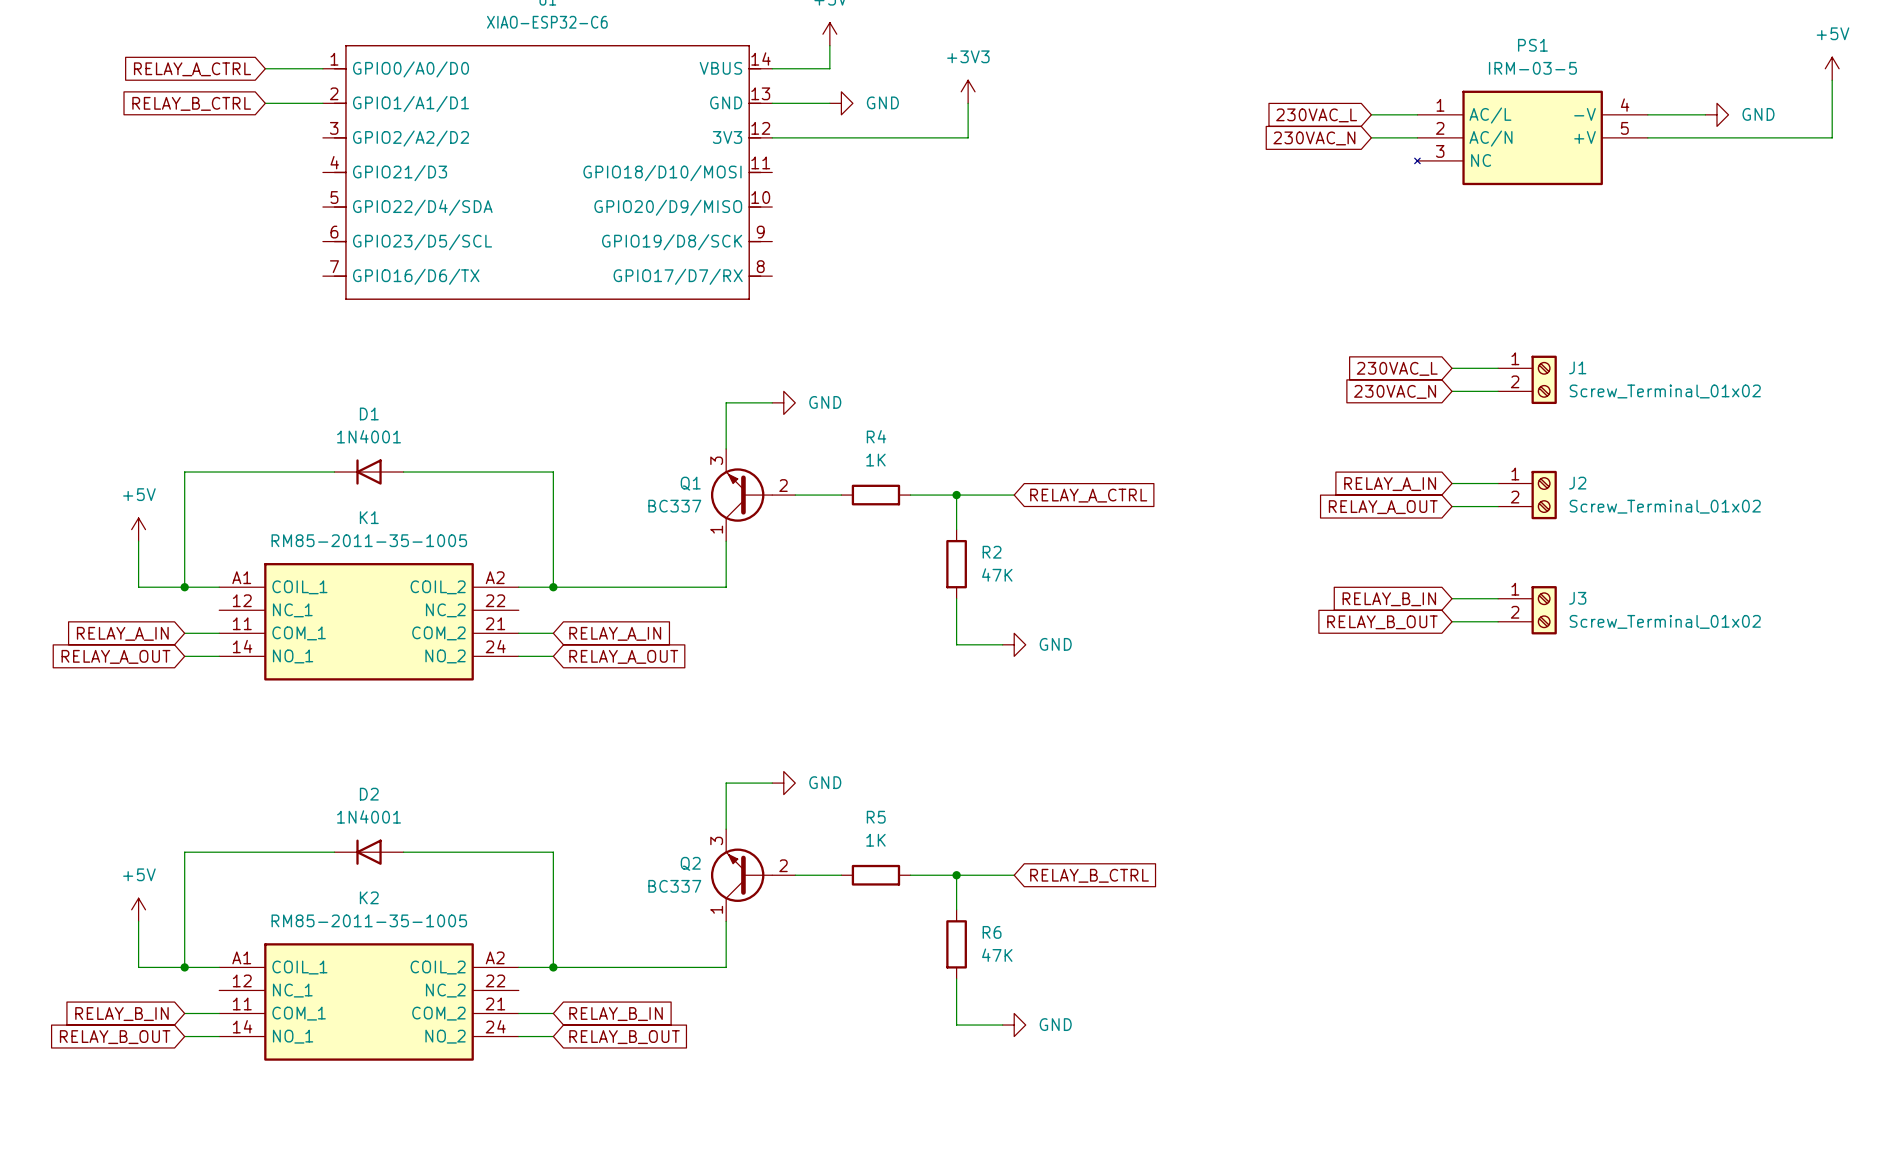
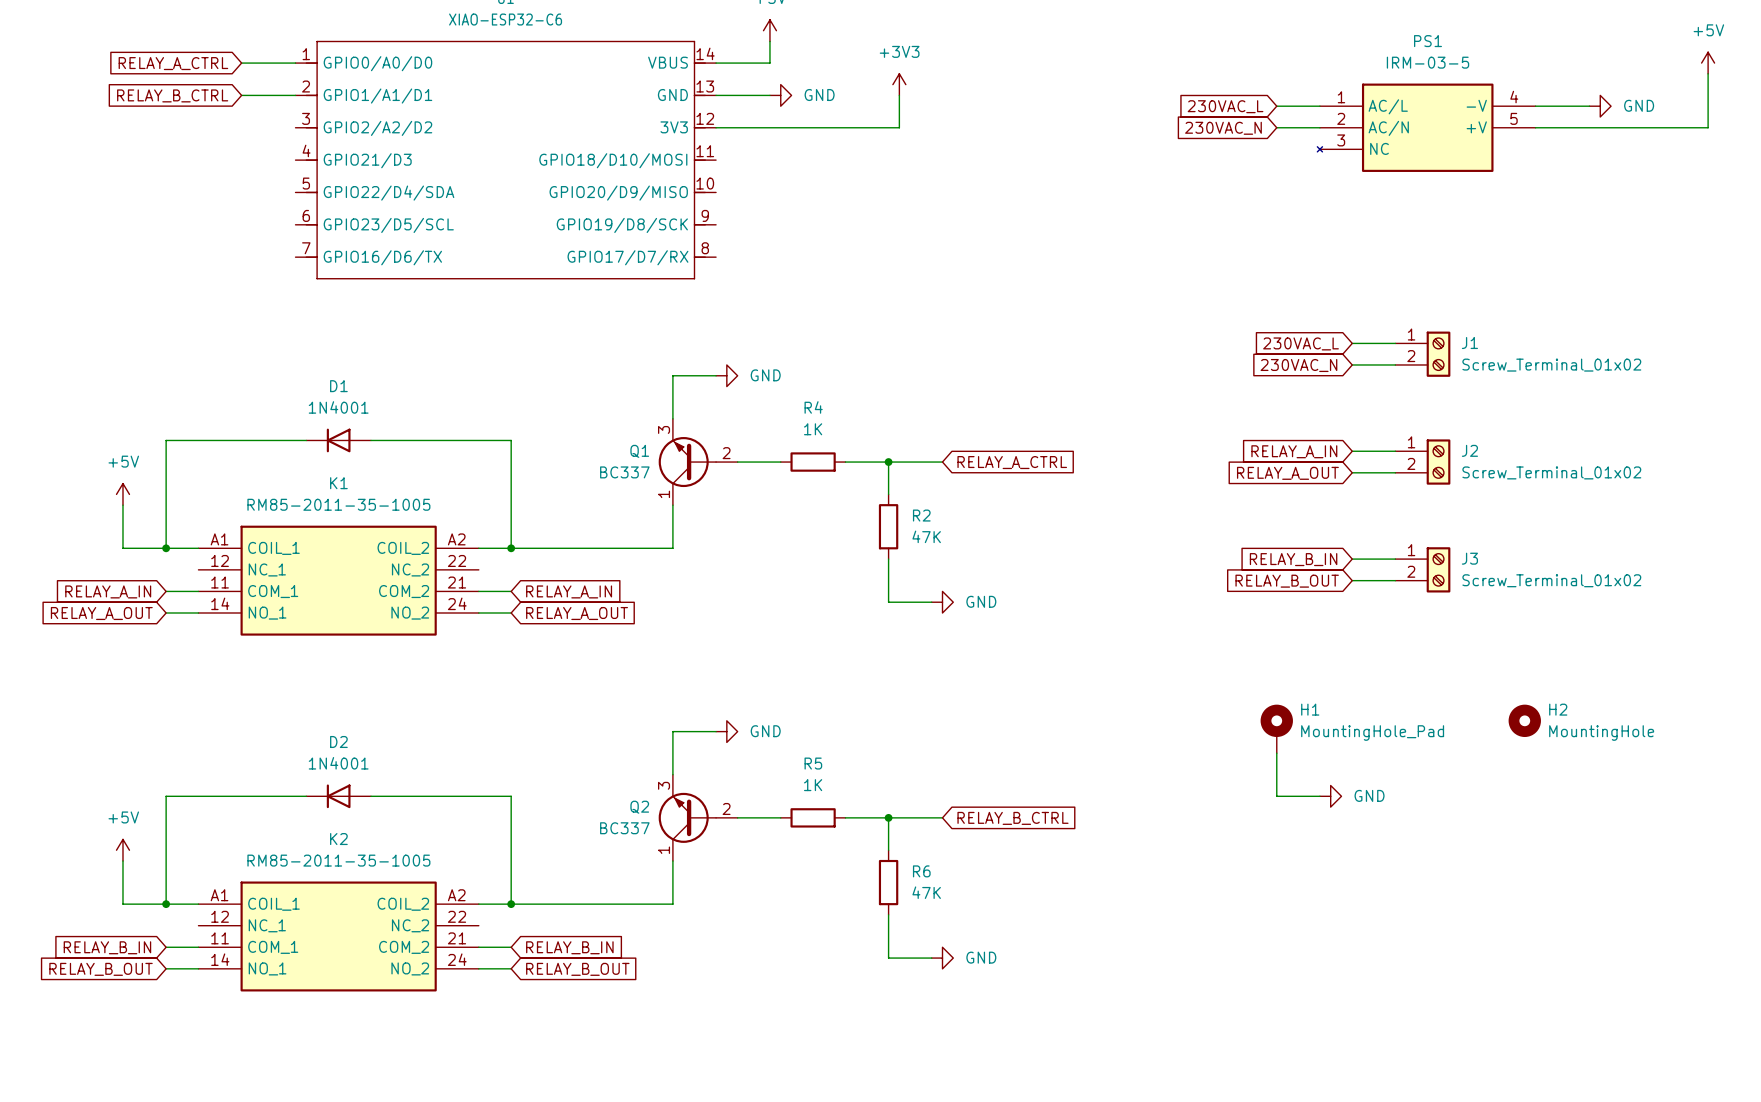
H2: none -> MountingHole (1524, 720)
H1: none -> MountingHole_Pad (1276, 728)
wire: none -> (1276, 753) (1276, 796) (1319, 796)
power symbol: none -> GND (1330, 796)

